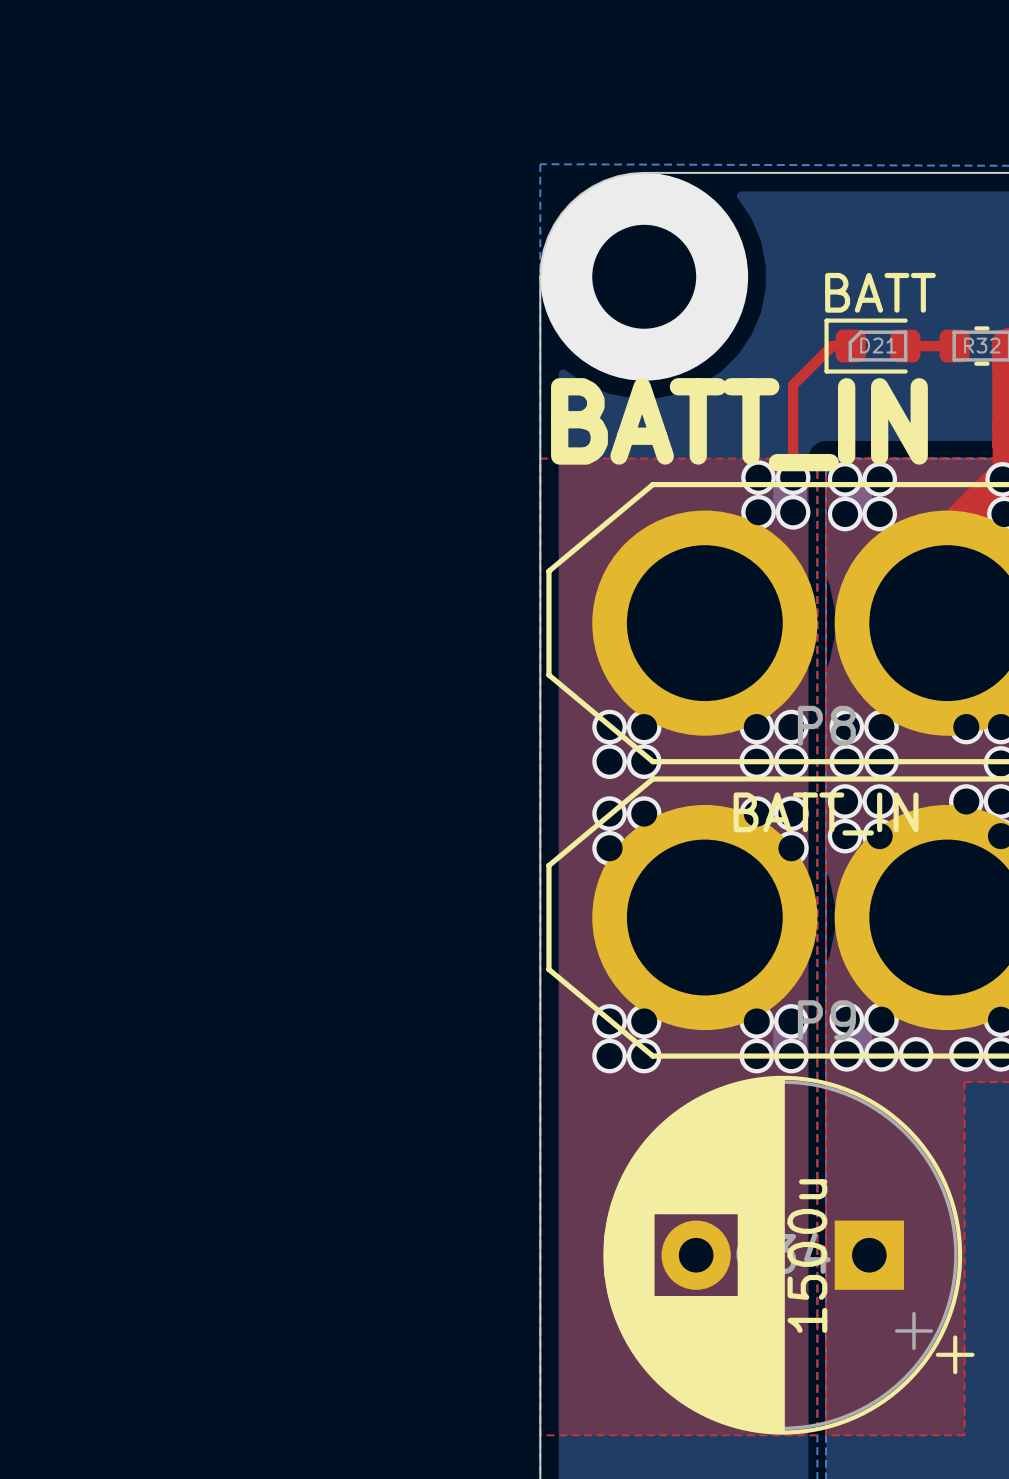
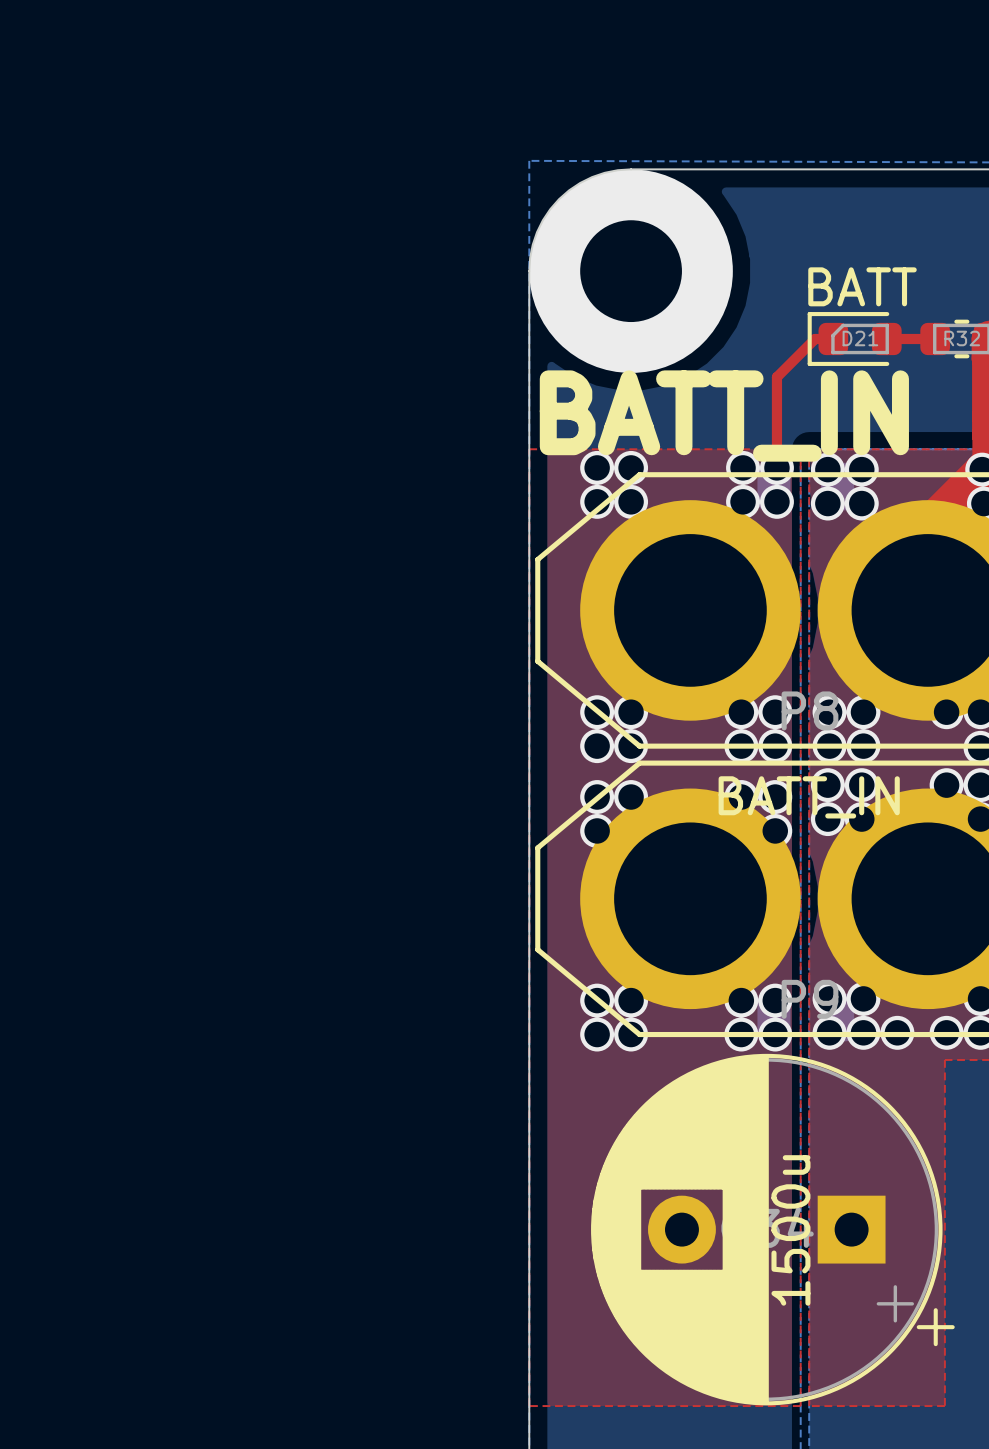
via: none -> (597, 467)
via: none -> (631, 467)
via: none -> (597, 501)
via: none -> (631, 501)

